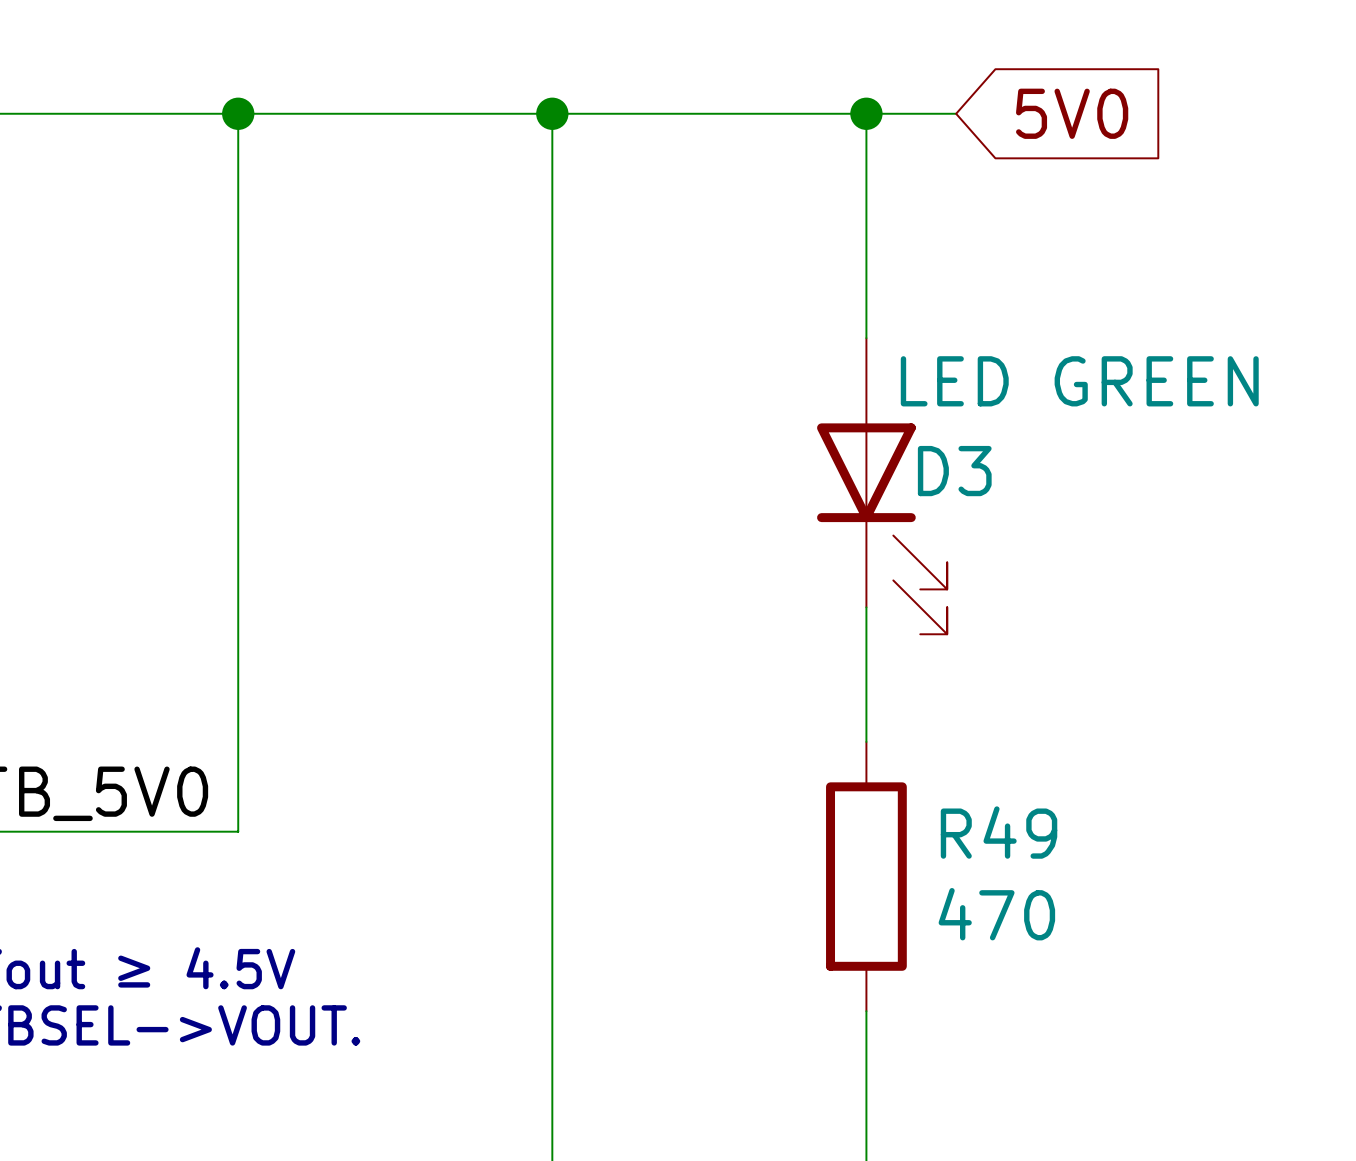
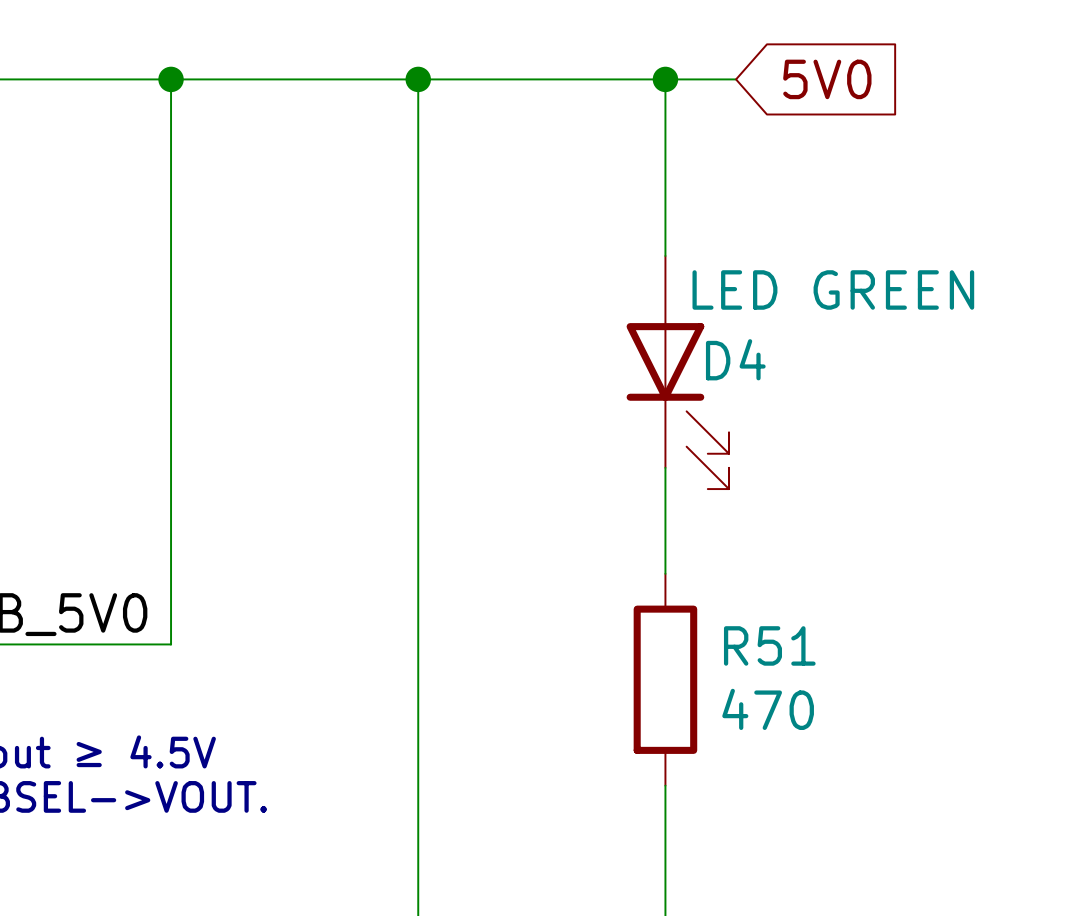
D3 name: D3 (954, 471) -> D4 (735, 359)
R49 name: R49 (999, 832) -> R51 (769, 645)

